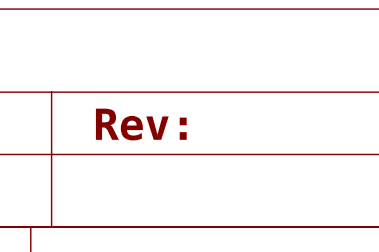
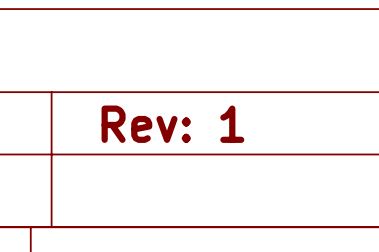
title block: Rev: (141, 124) -> Rev: 1 (172, 124)

